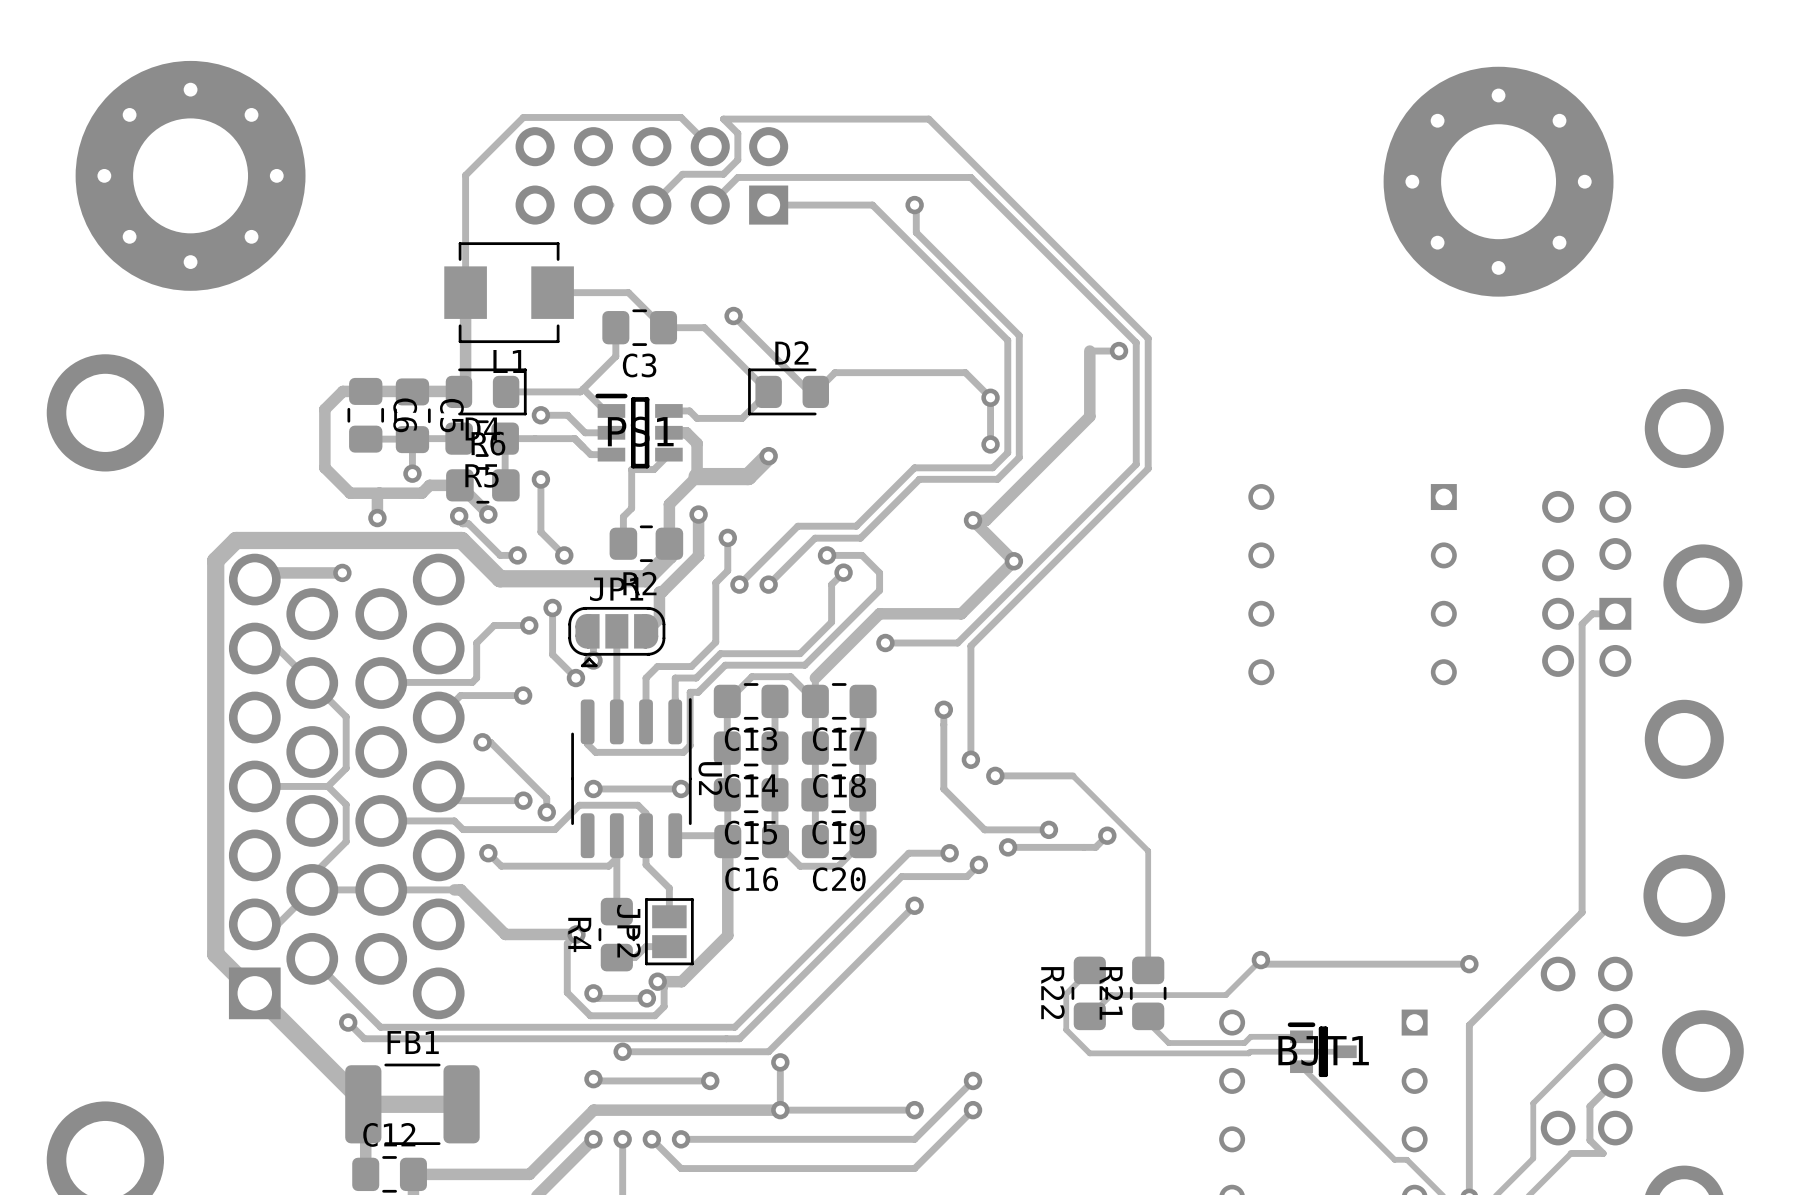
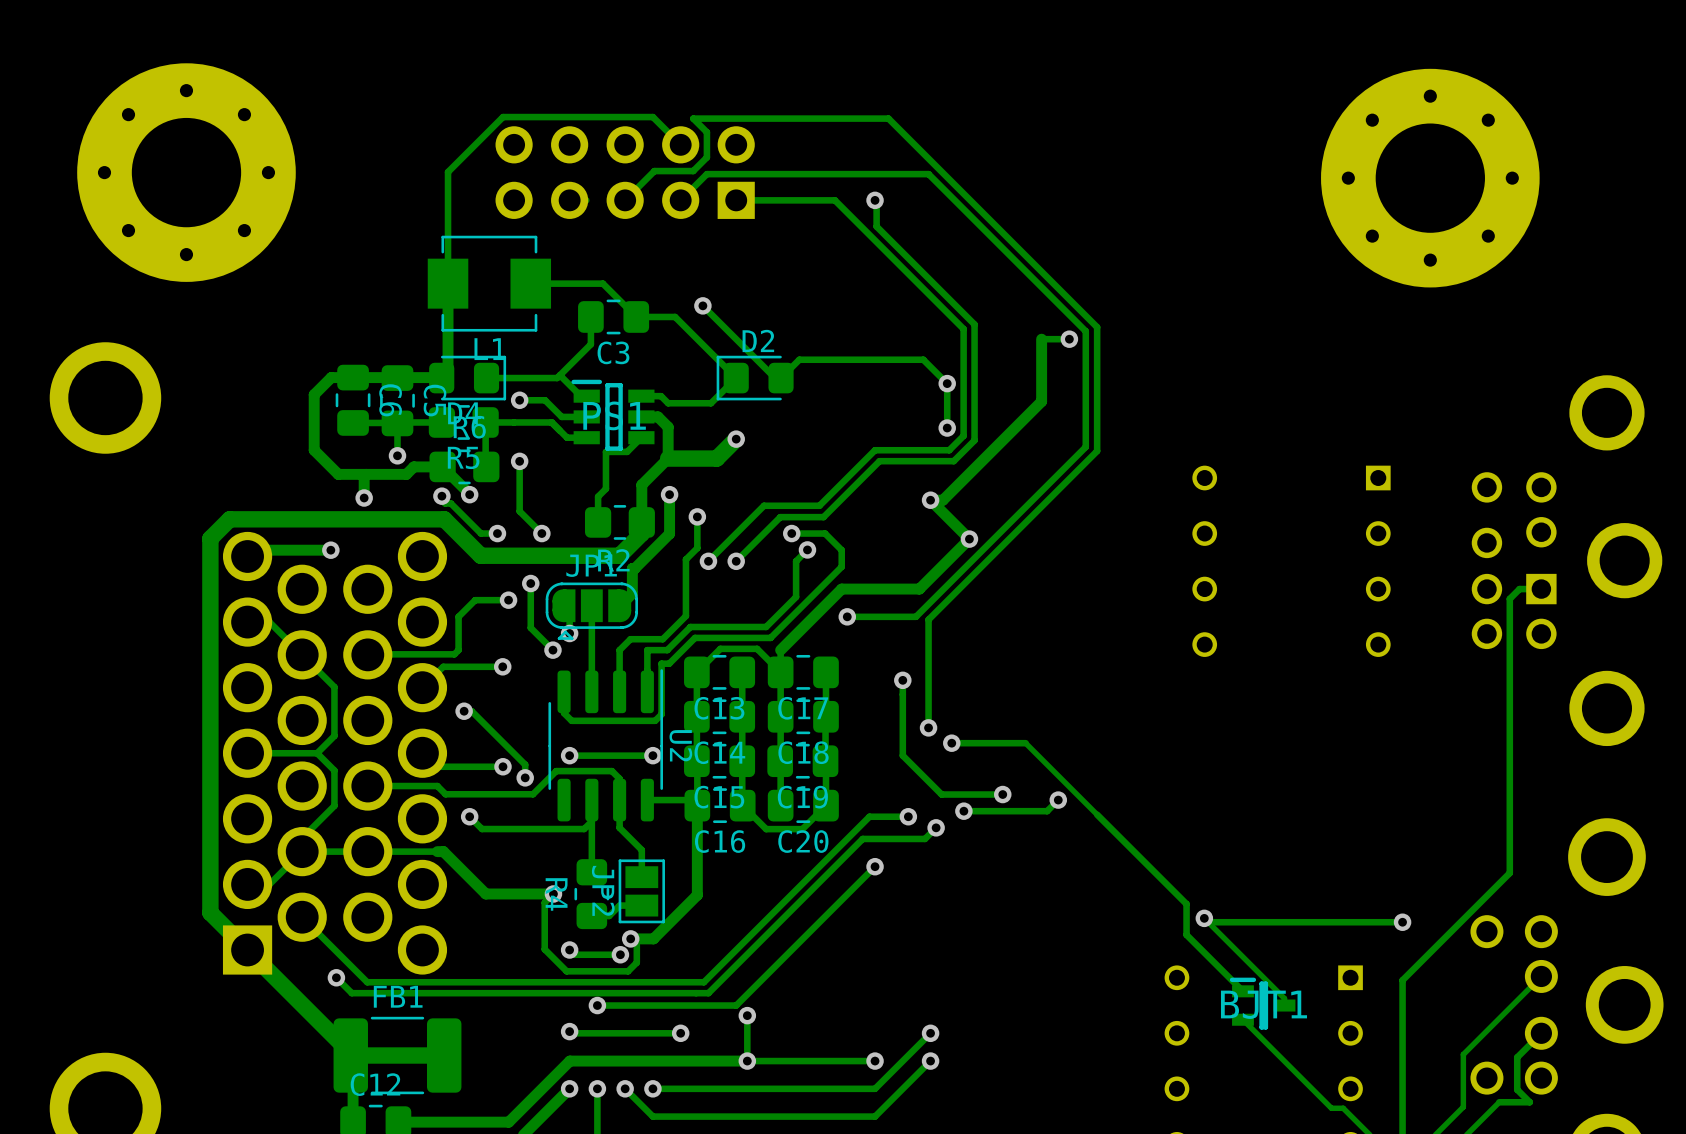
track: (1148, 851) (1148, 970) -> none
track: (1260, 960) (1225, 995) (1111, 995) (1089, 1016) -> none
track: (1089, 970) (1066, 993) (1066, 1029) (1089, 1053) (1345, 1051) -> (1204, 918) (1284, 998) (1284, 1005)
R22: (1089, 993) -> none
R21: (1148, 993) -> none
track: (1148, 1016) (1148, 1022) (1168, 1043) (1244, 1043) (1250, 1036) (1301, 1036) -> (1097, 814) (1186, 904) (1186, 934) (1242, 991)

